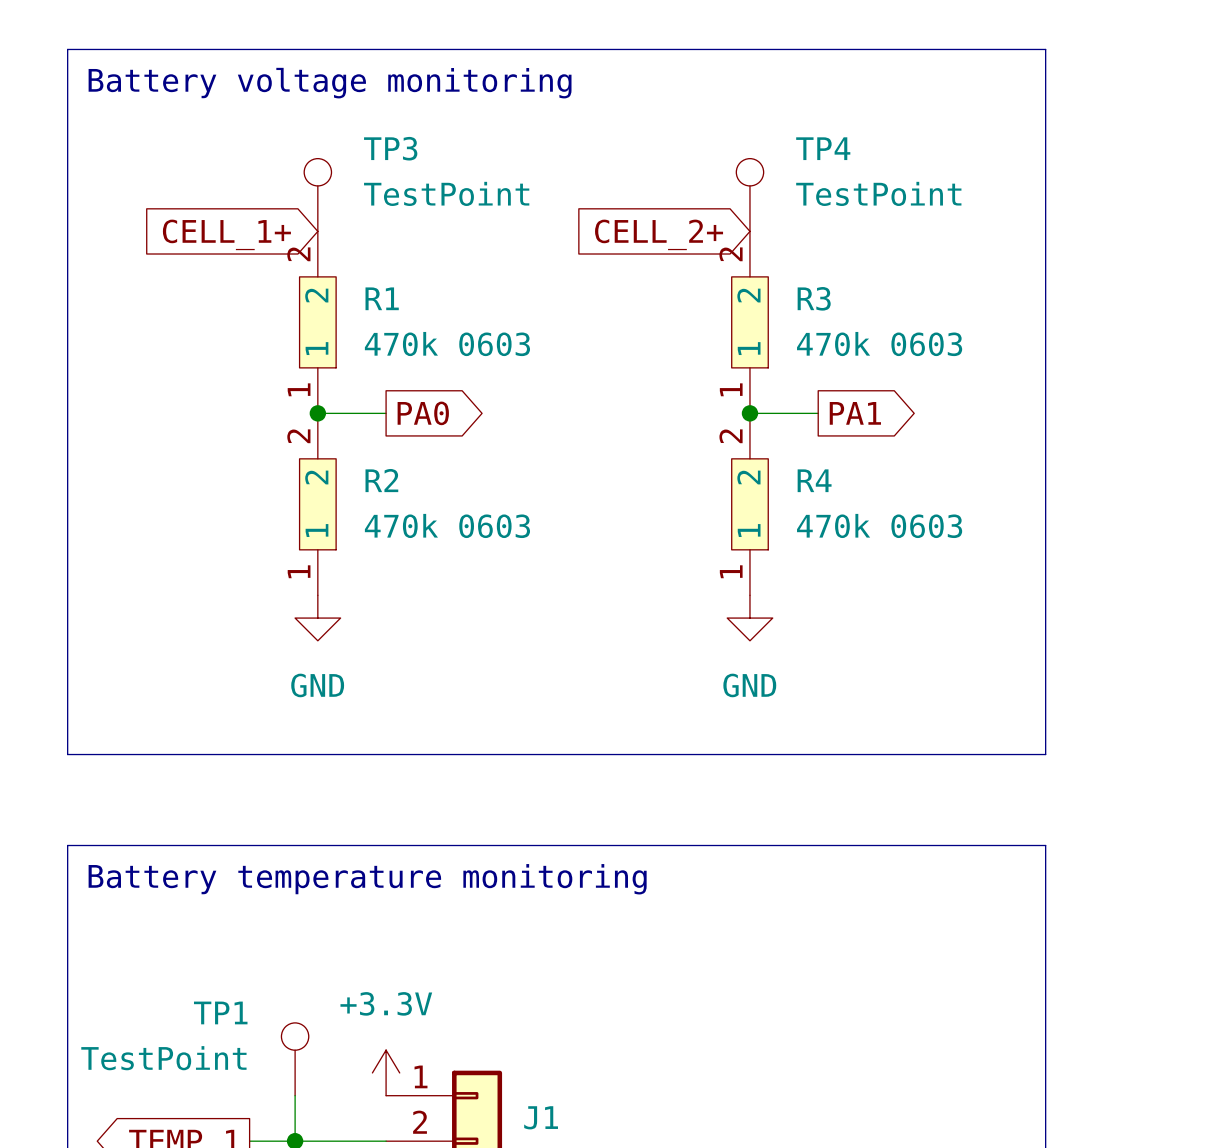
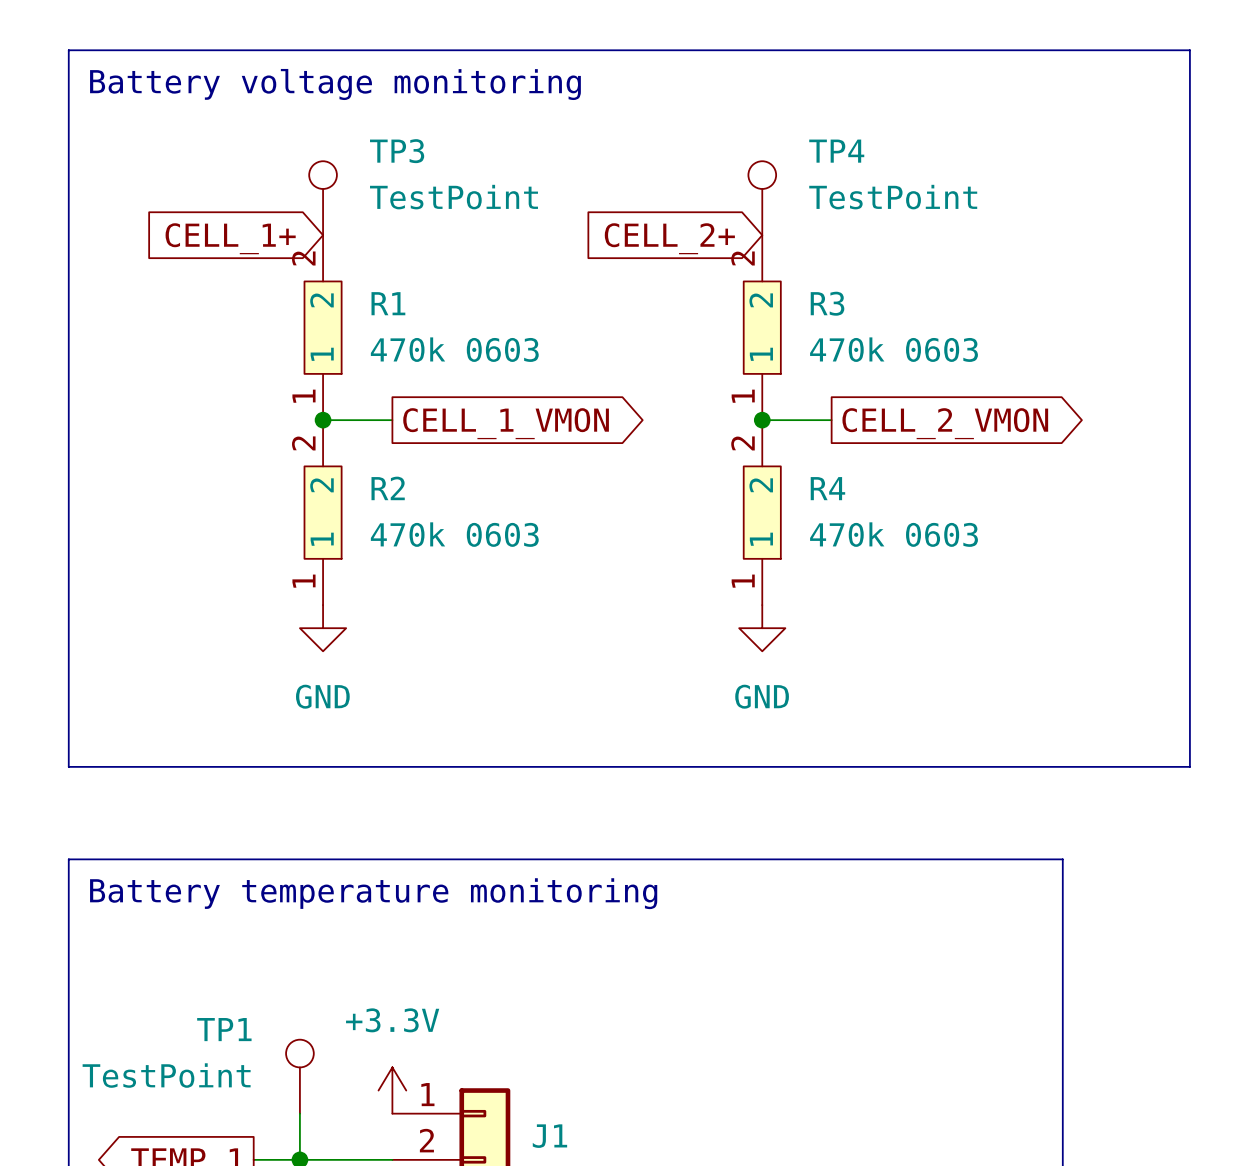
line: (1045, 49) (1045, 754) -> (1062, 50) (1189, 50) (1189, 766) (1062, 766)
global label: PA0 (423, 413) -> CELL_1_VMON (506, 423)
global label: PA1 (855, 413) -> CELL_2_VMON (945, 423)

